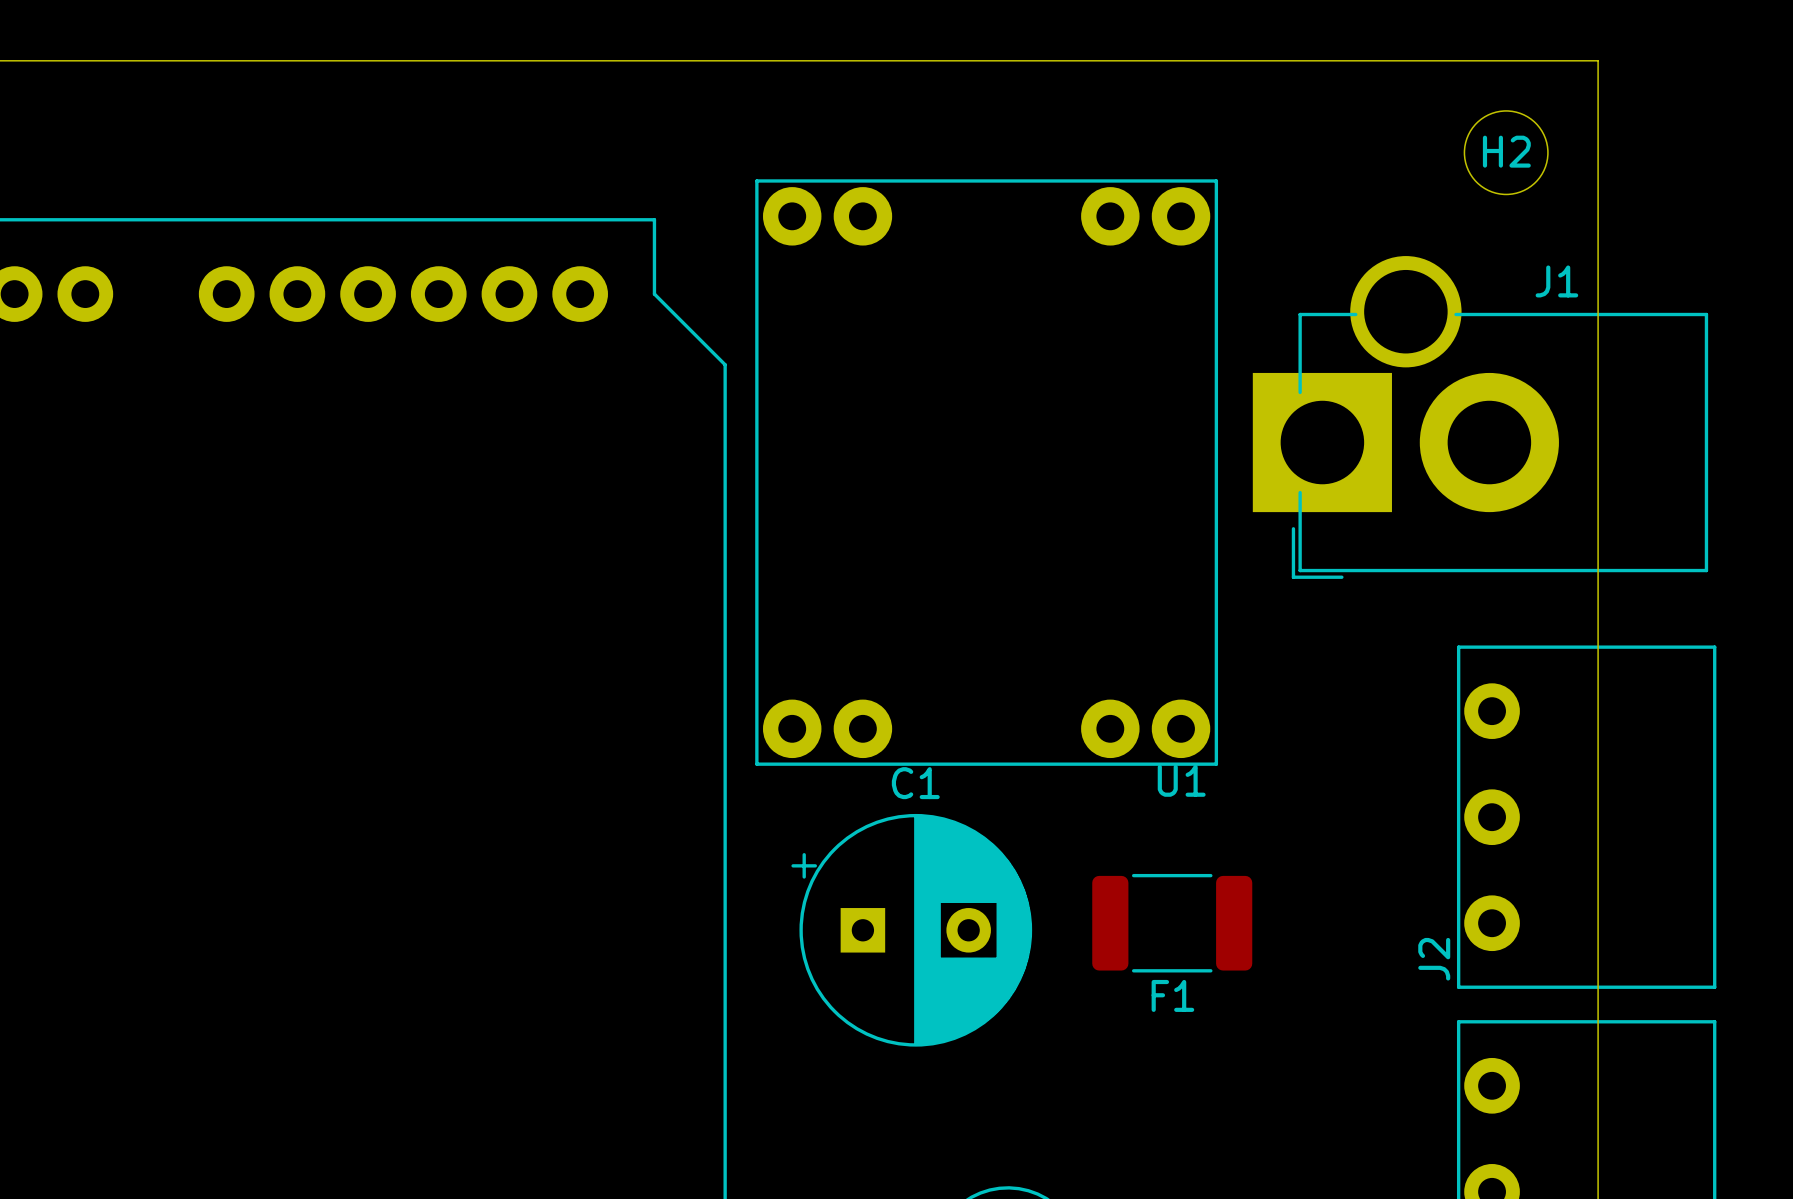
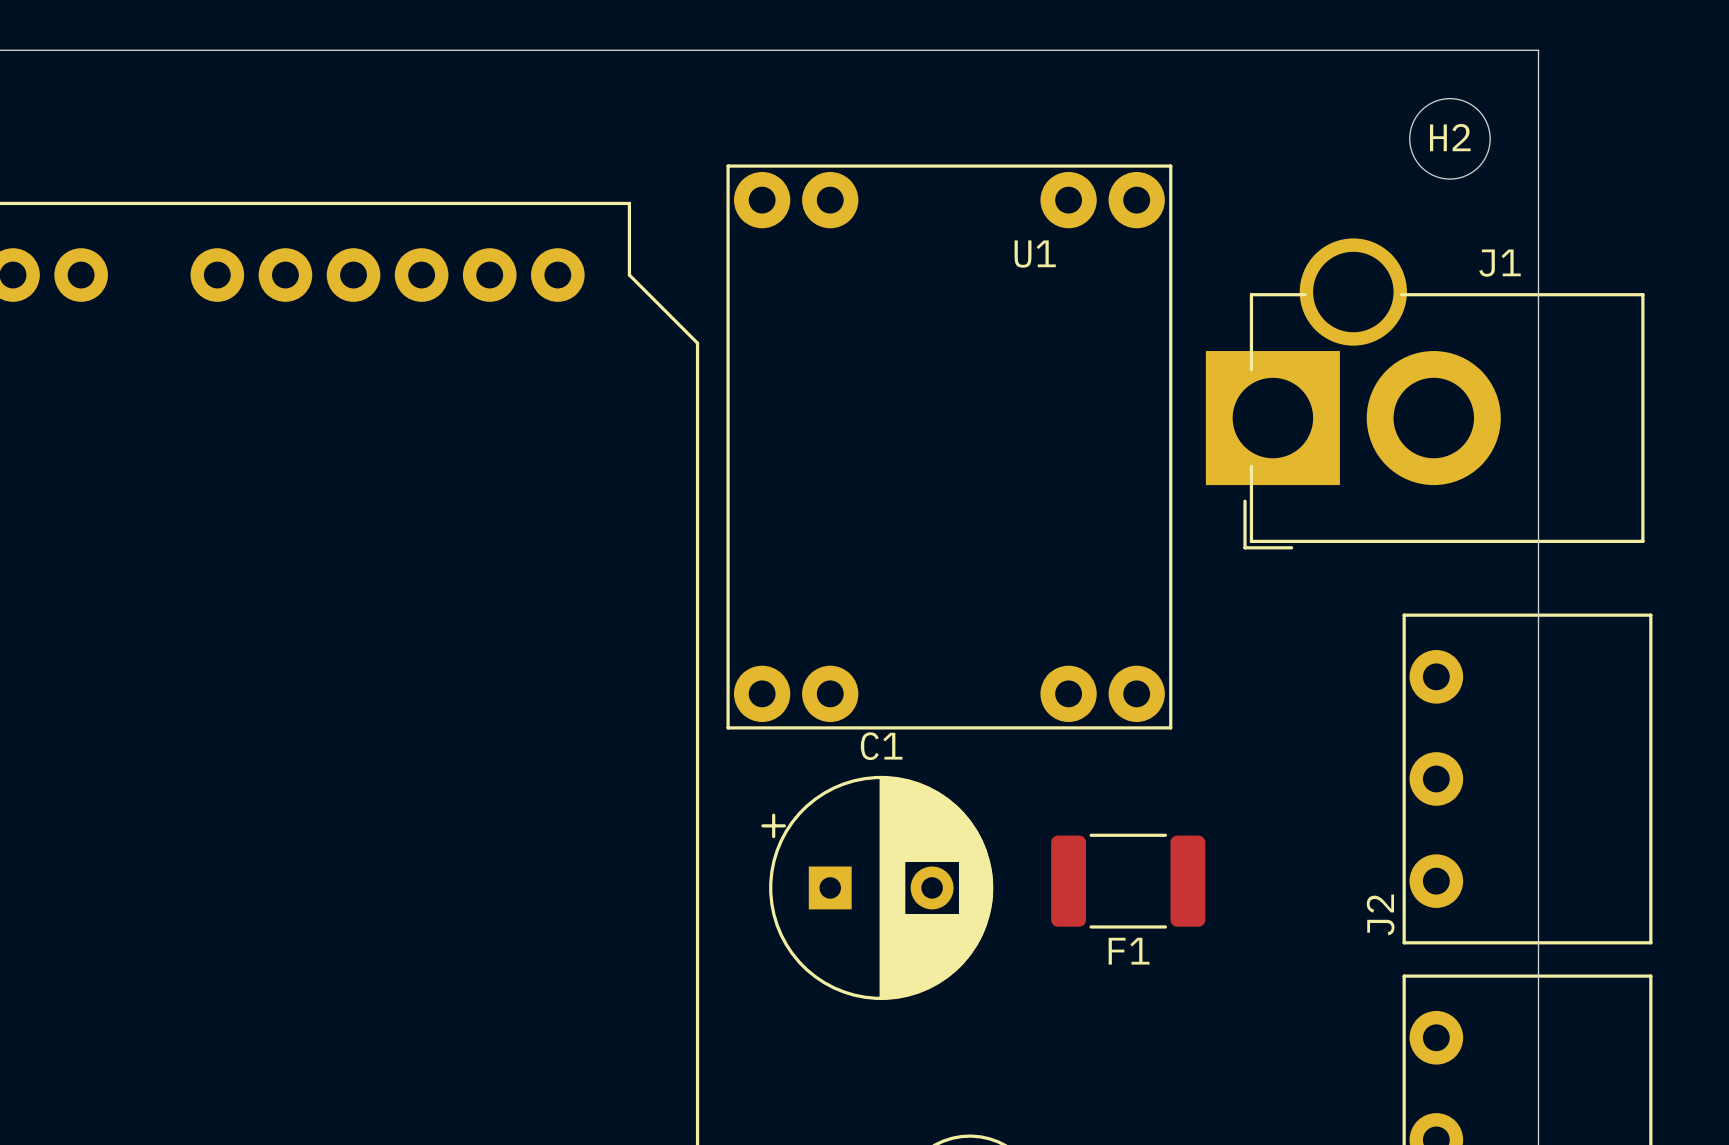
U1 name position: U1 (1181, 780) -> U1 (1035, 254)

